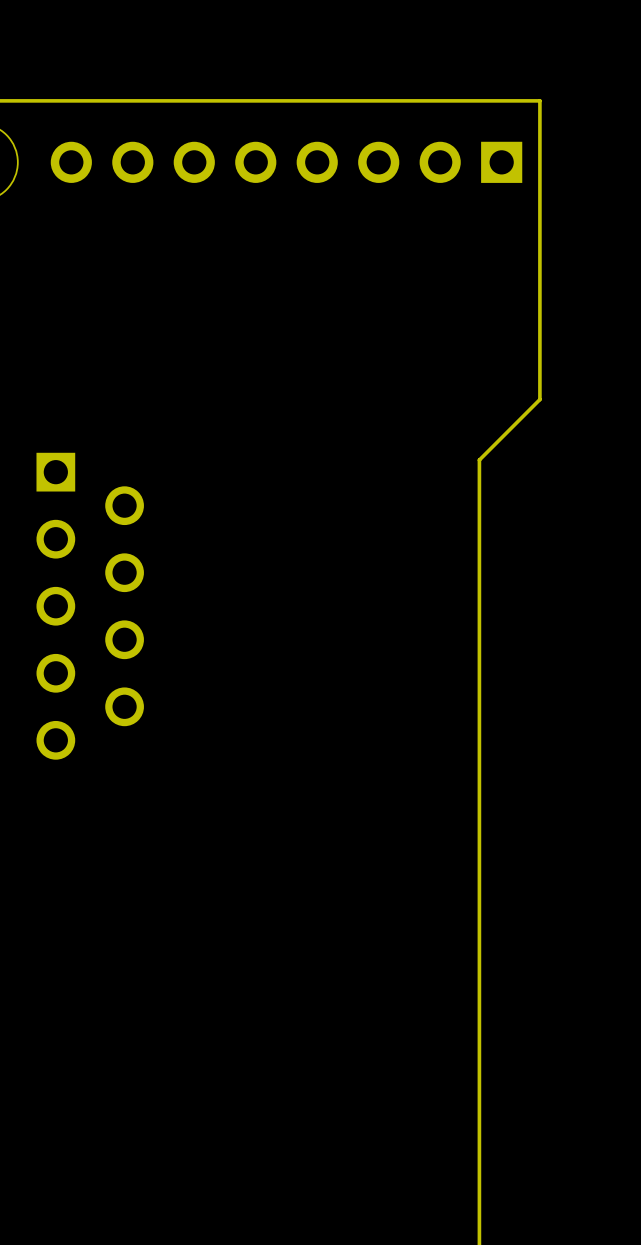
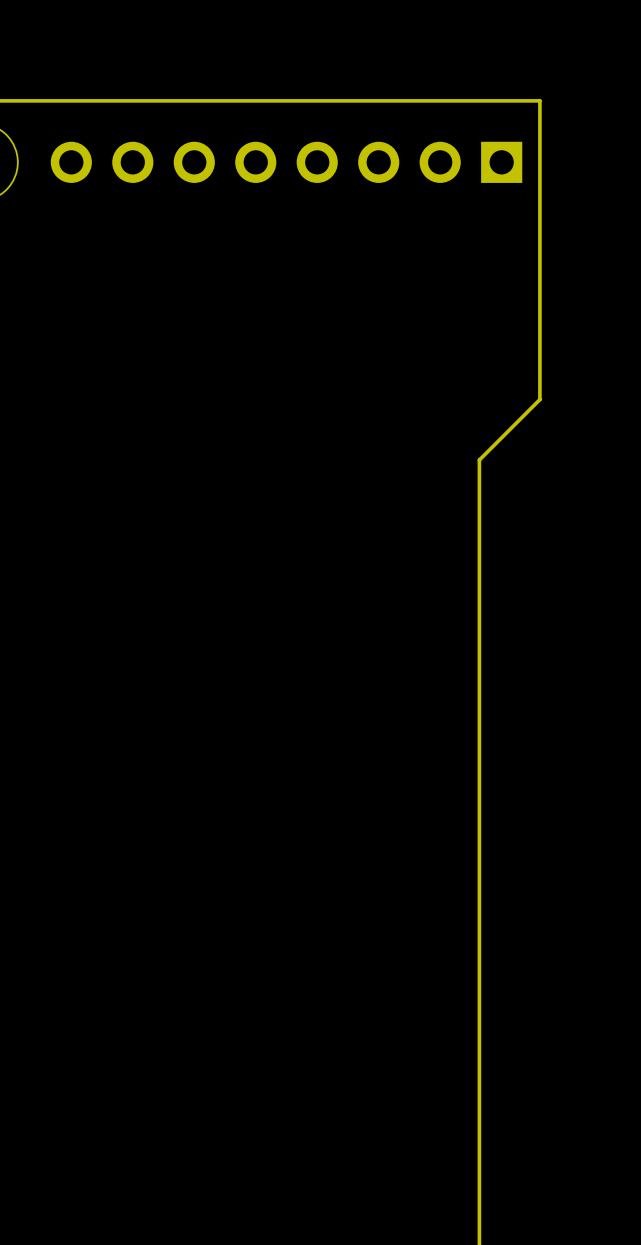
part: (90, 606) -> none

